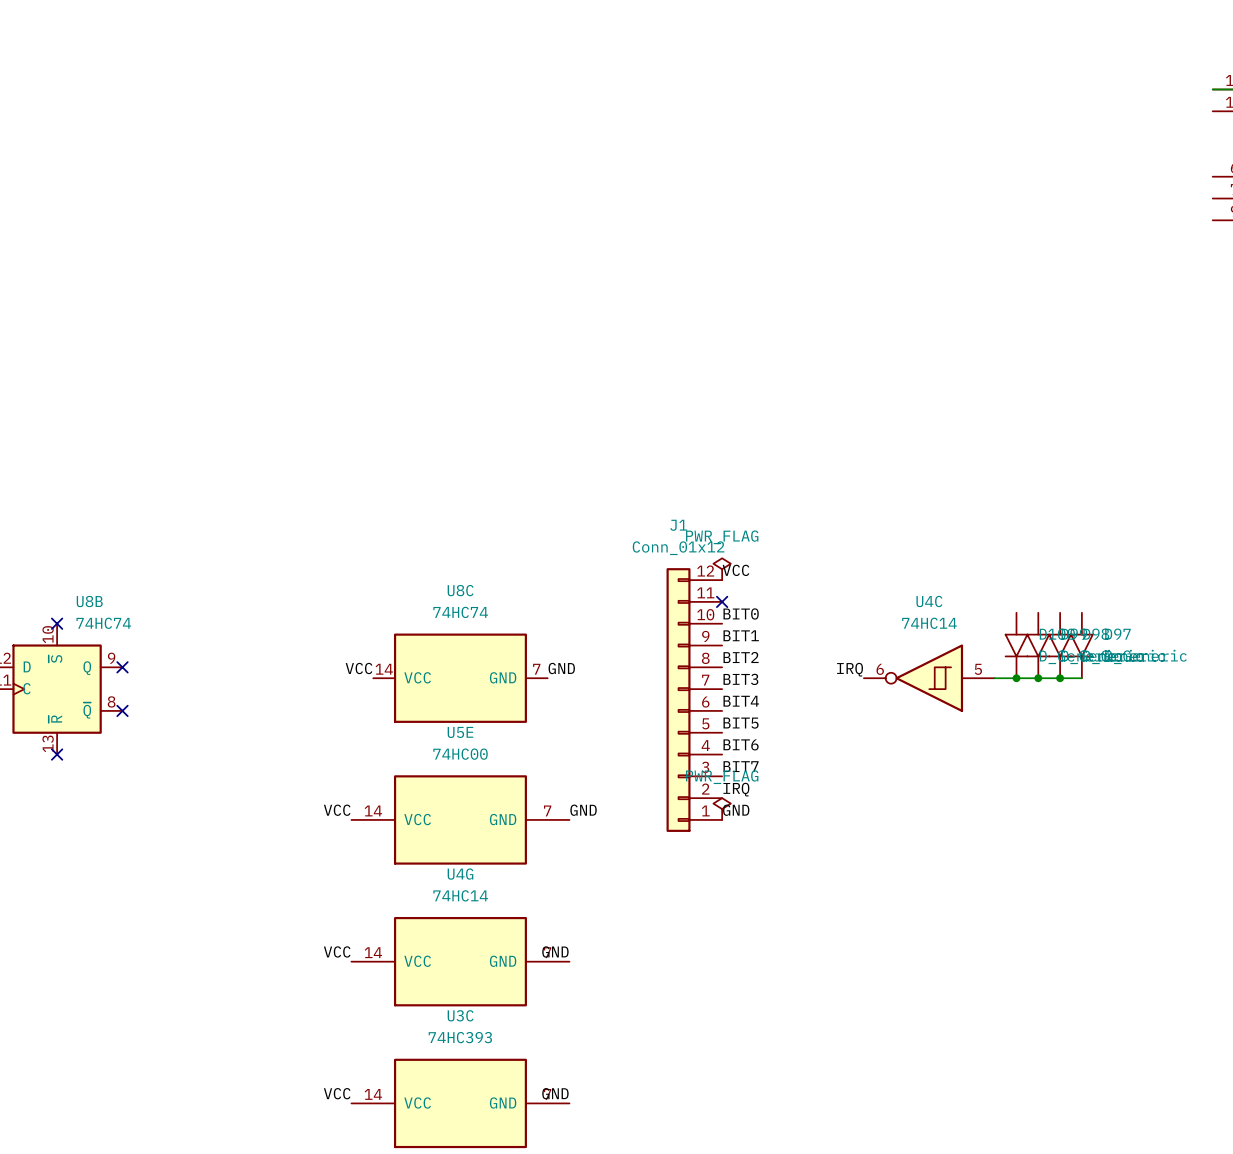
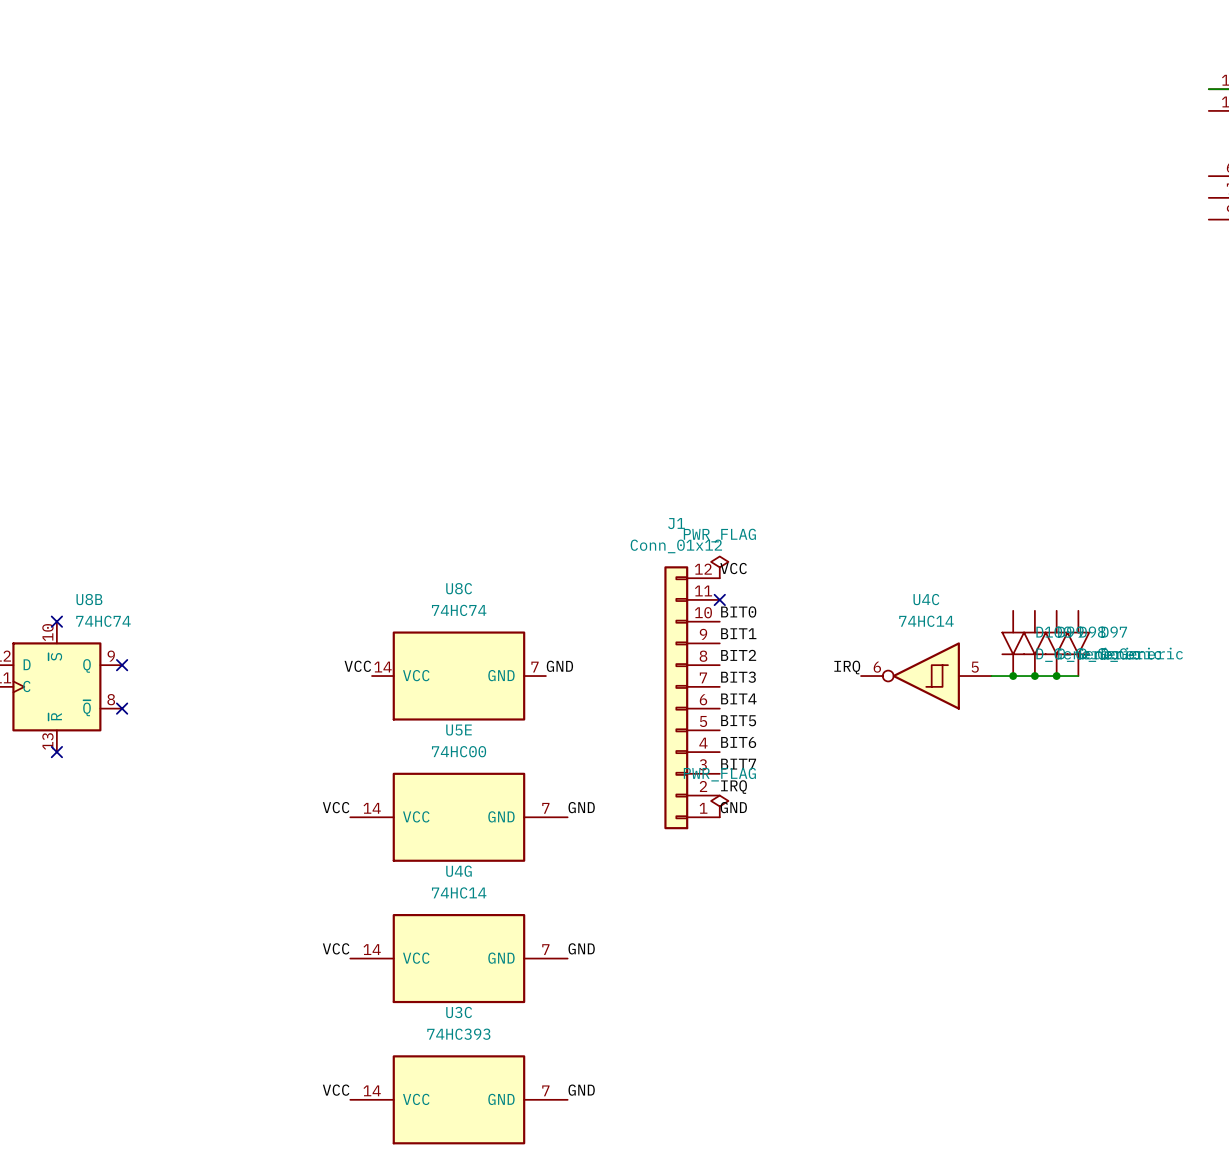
label position: GND (555, 951) -> GND (581, 948)
label position: GND (555, 1093) -> GND (581, 1090)

